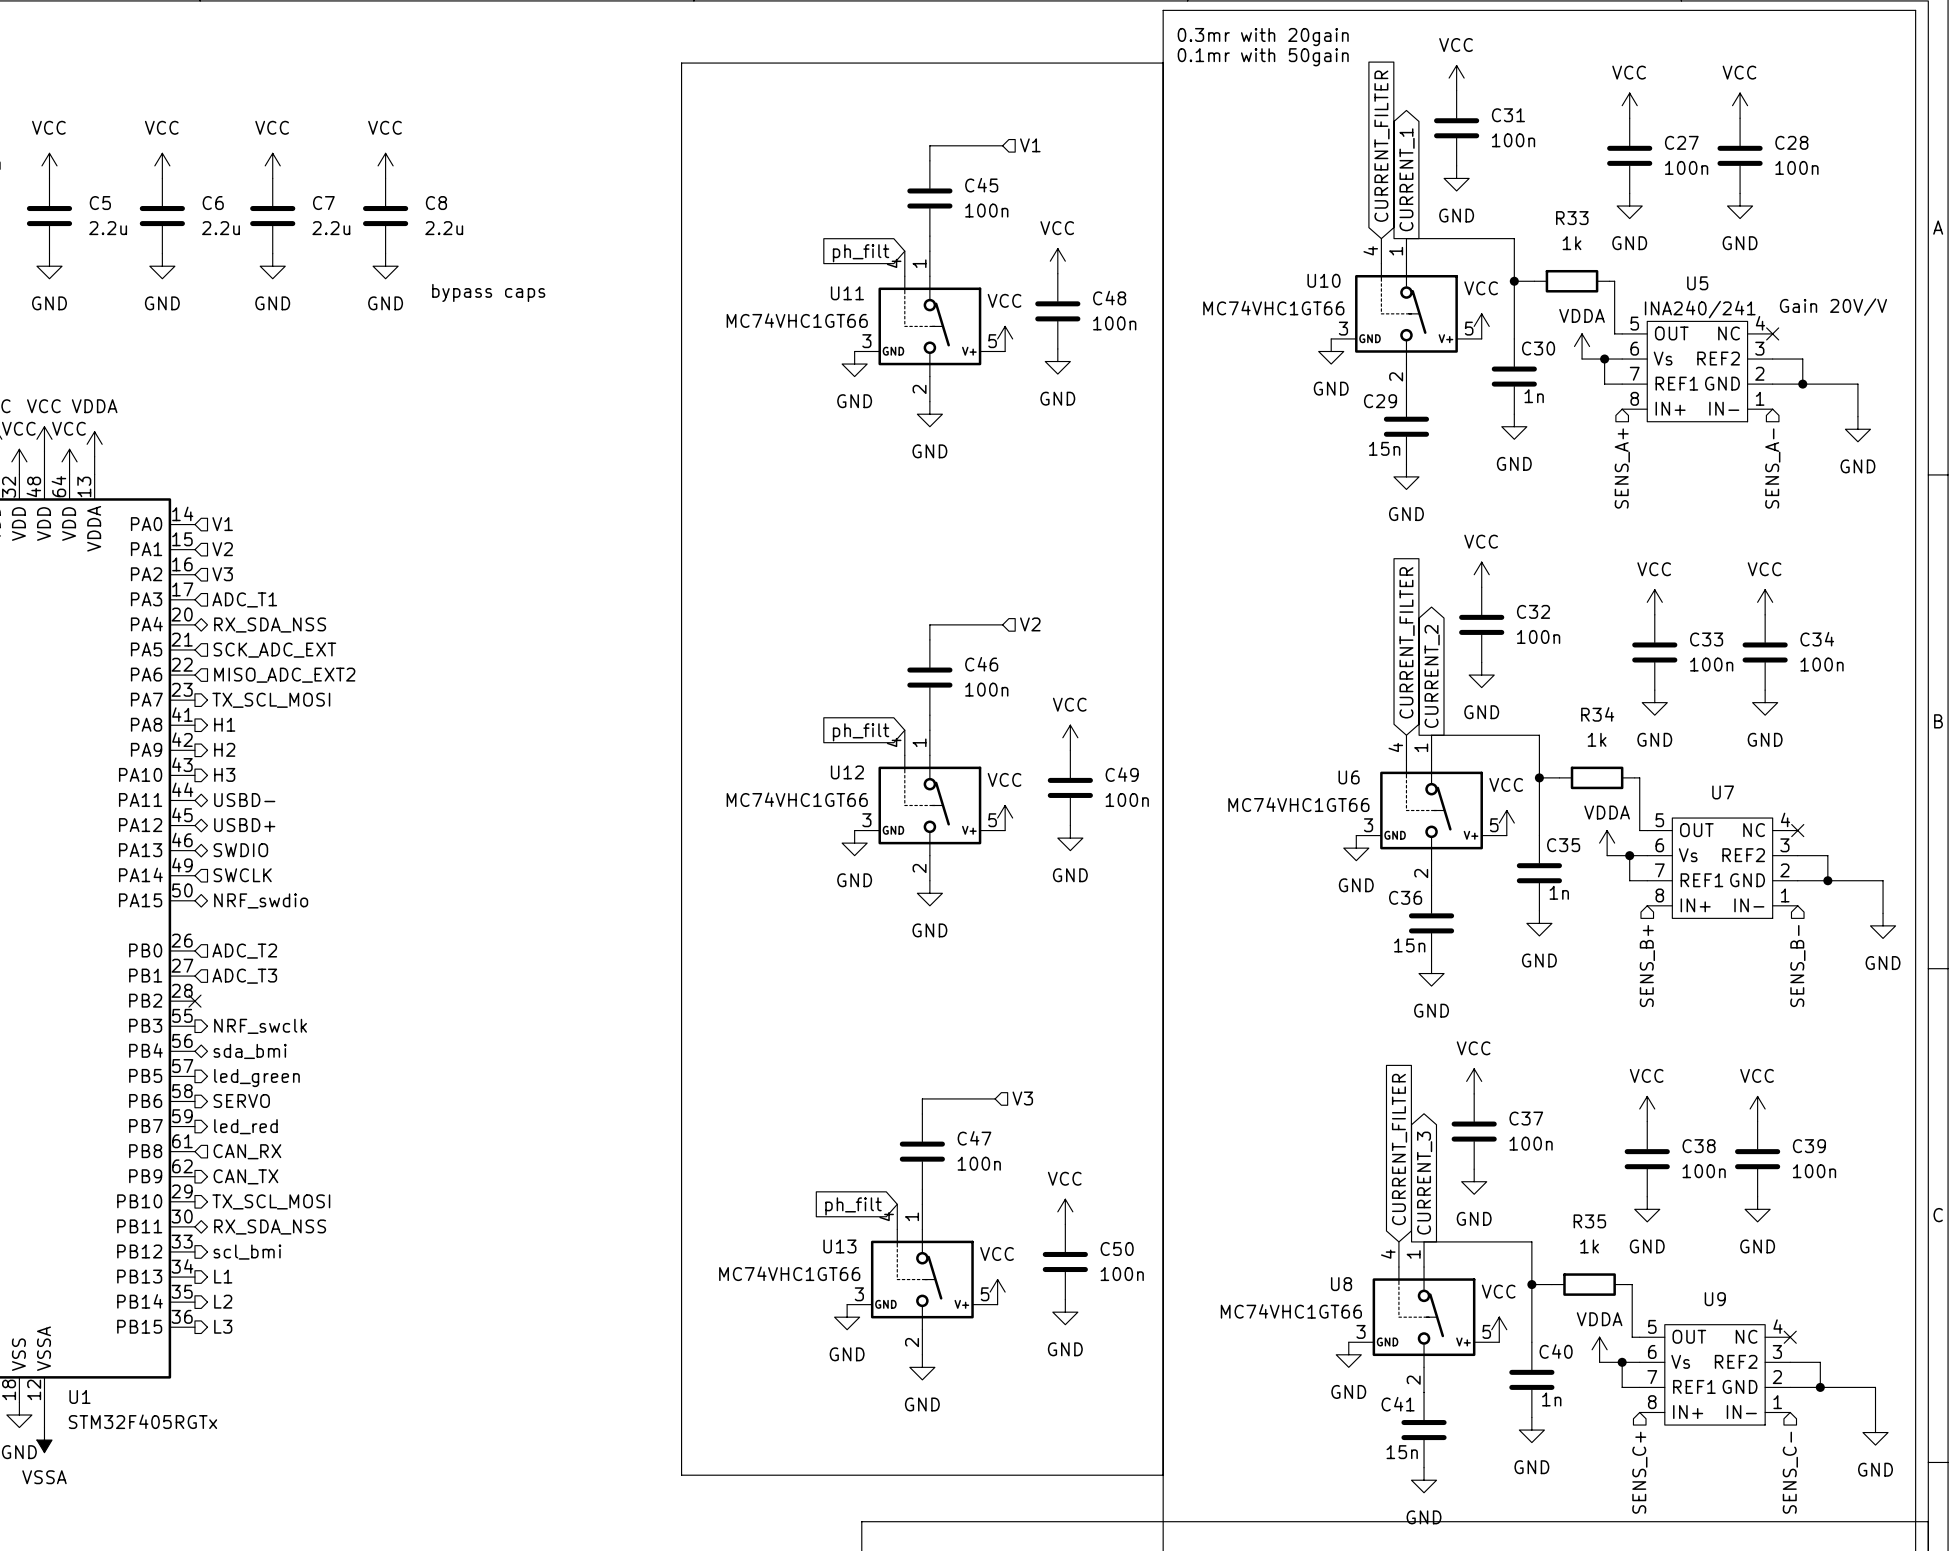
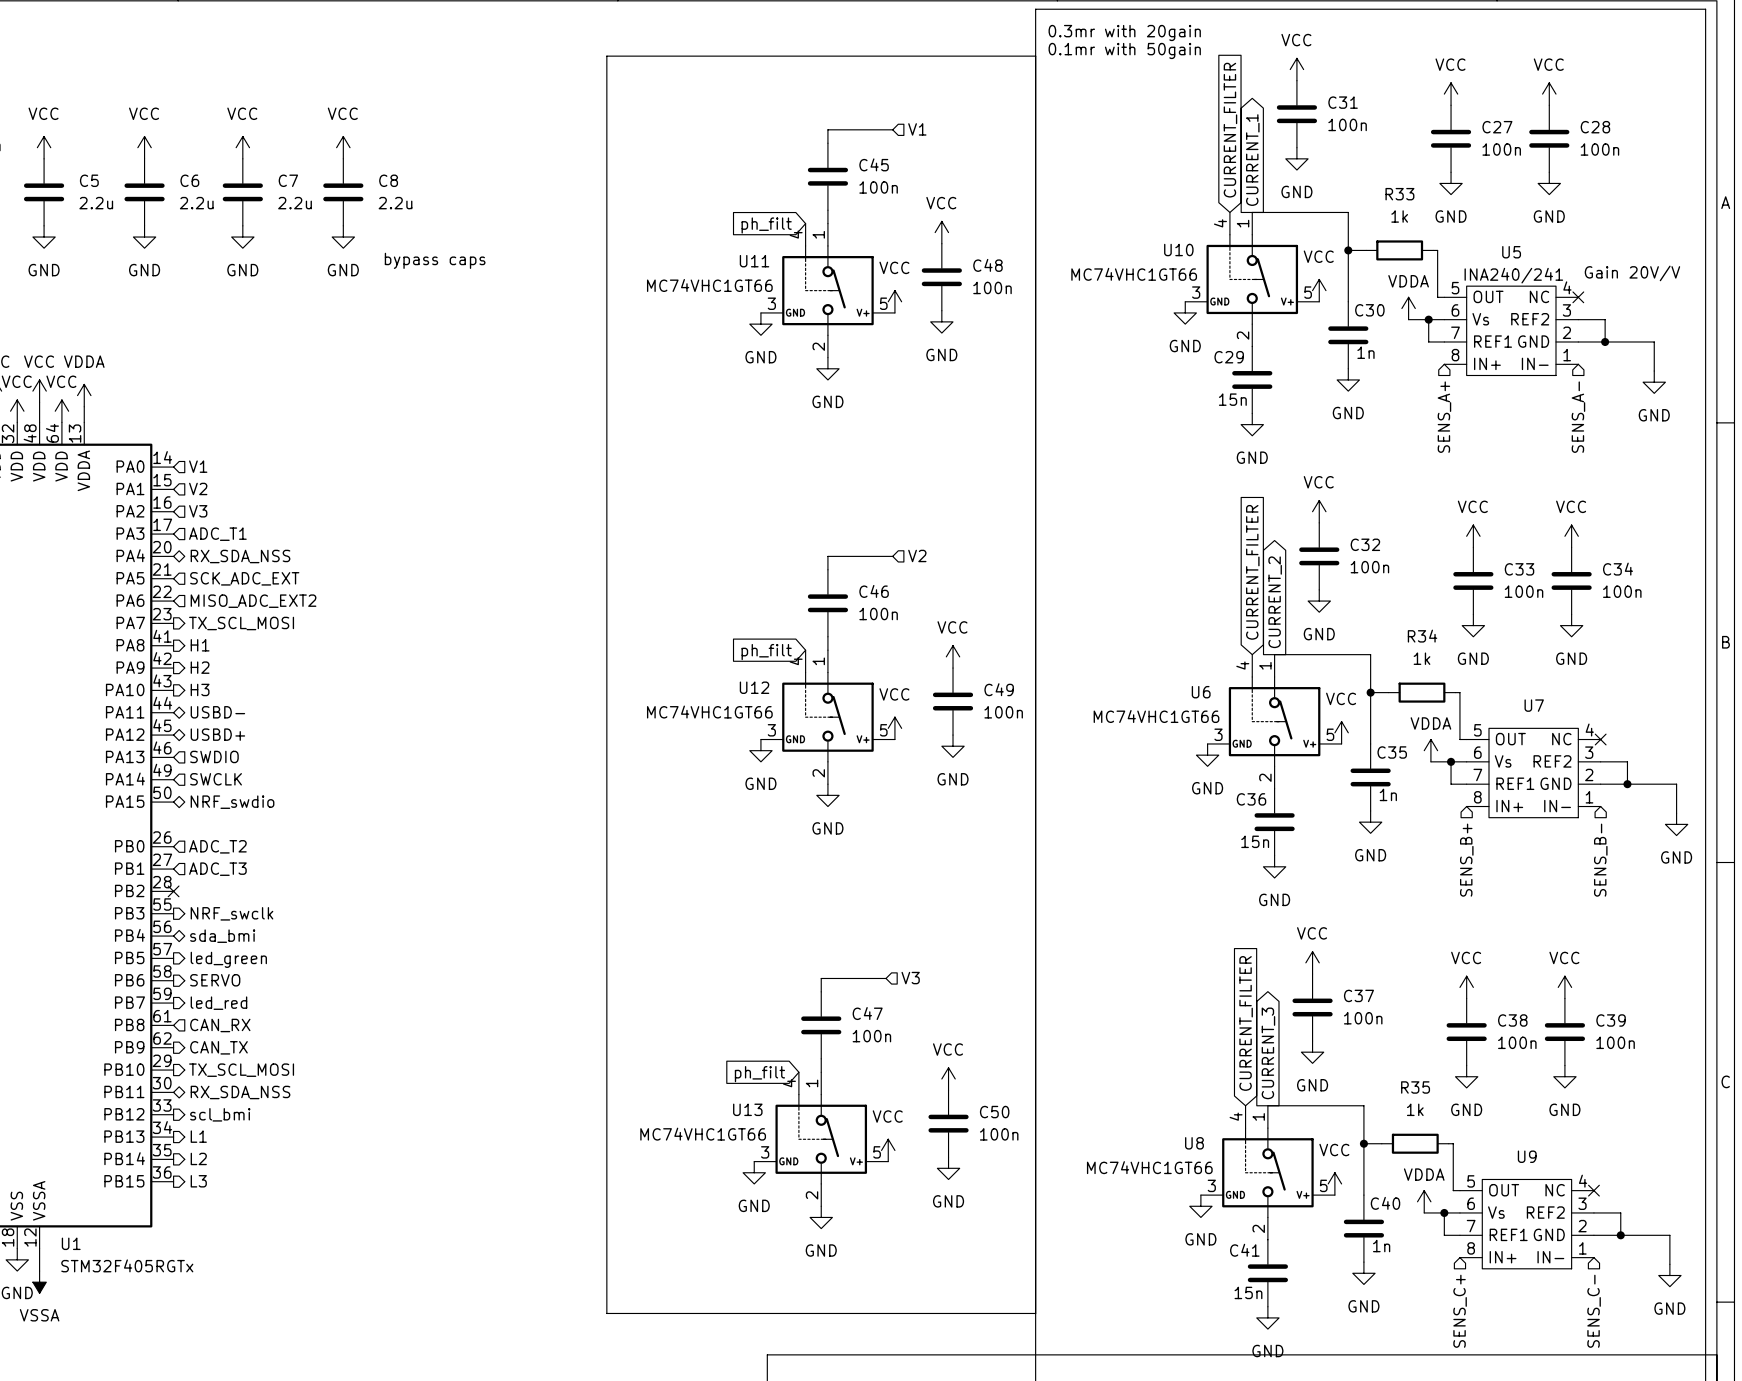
hierarchical label shape: bidirectional (240, 850) -> input (214, 756)

